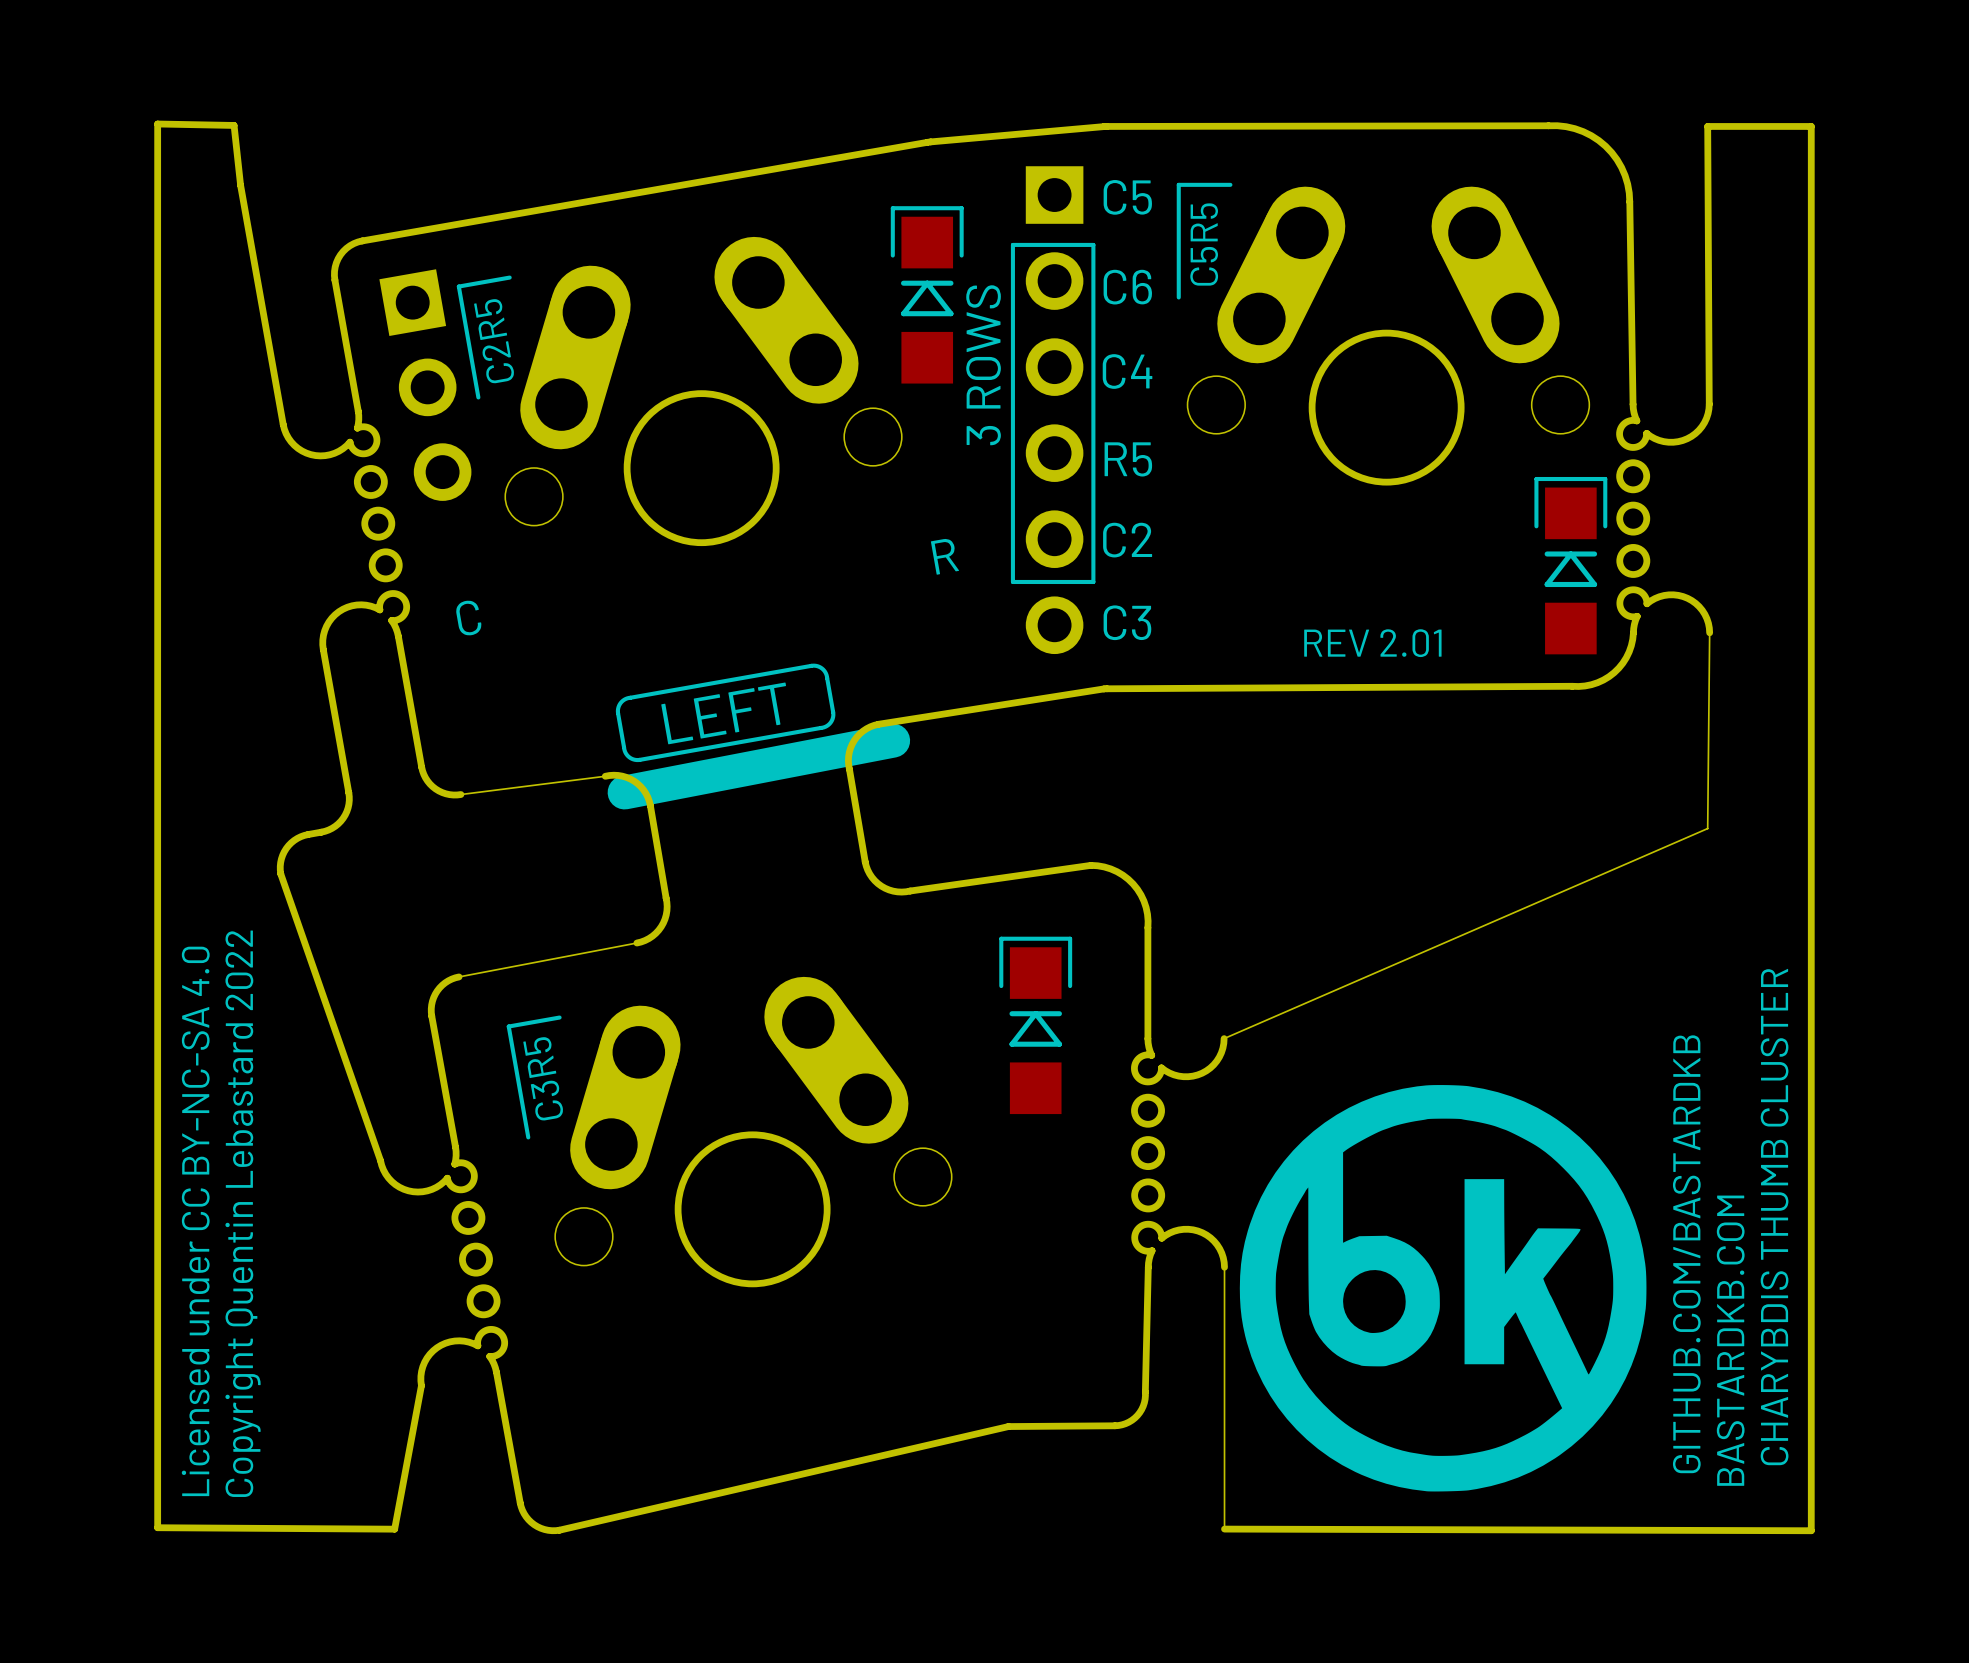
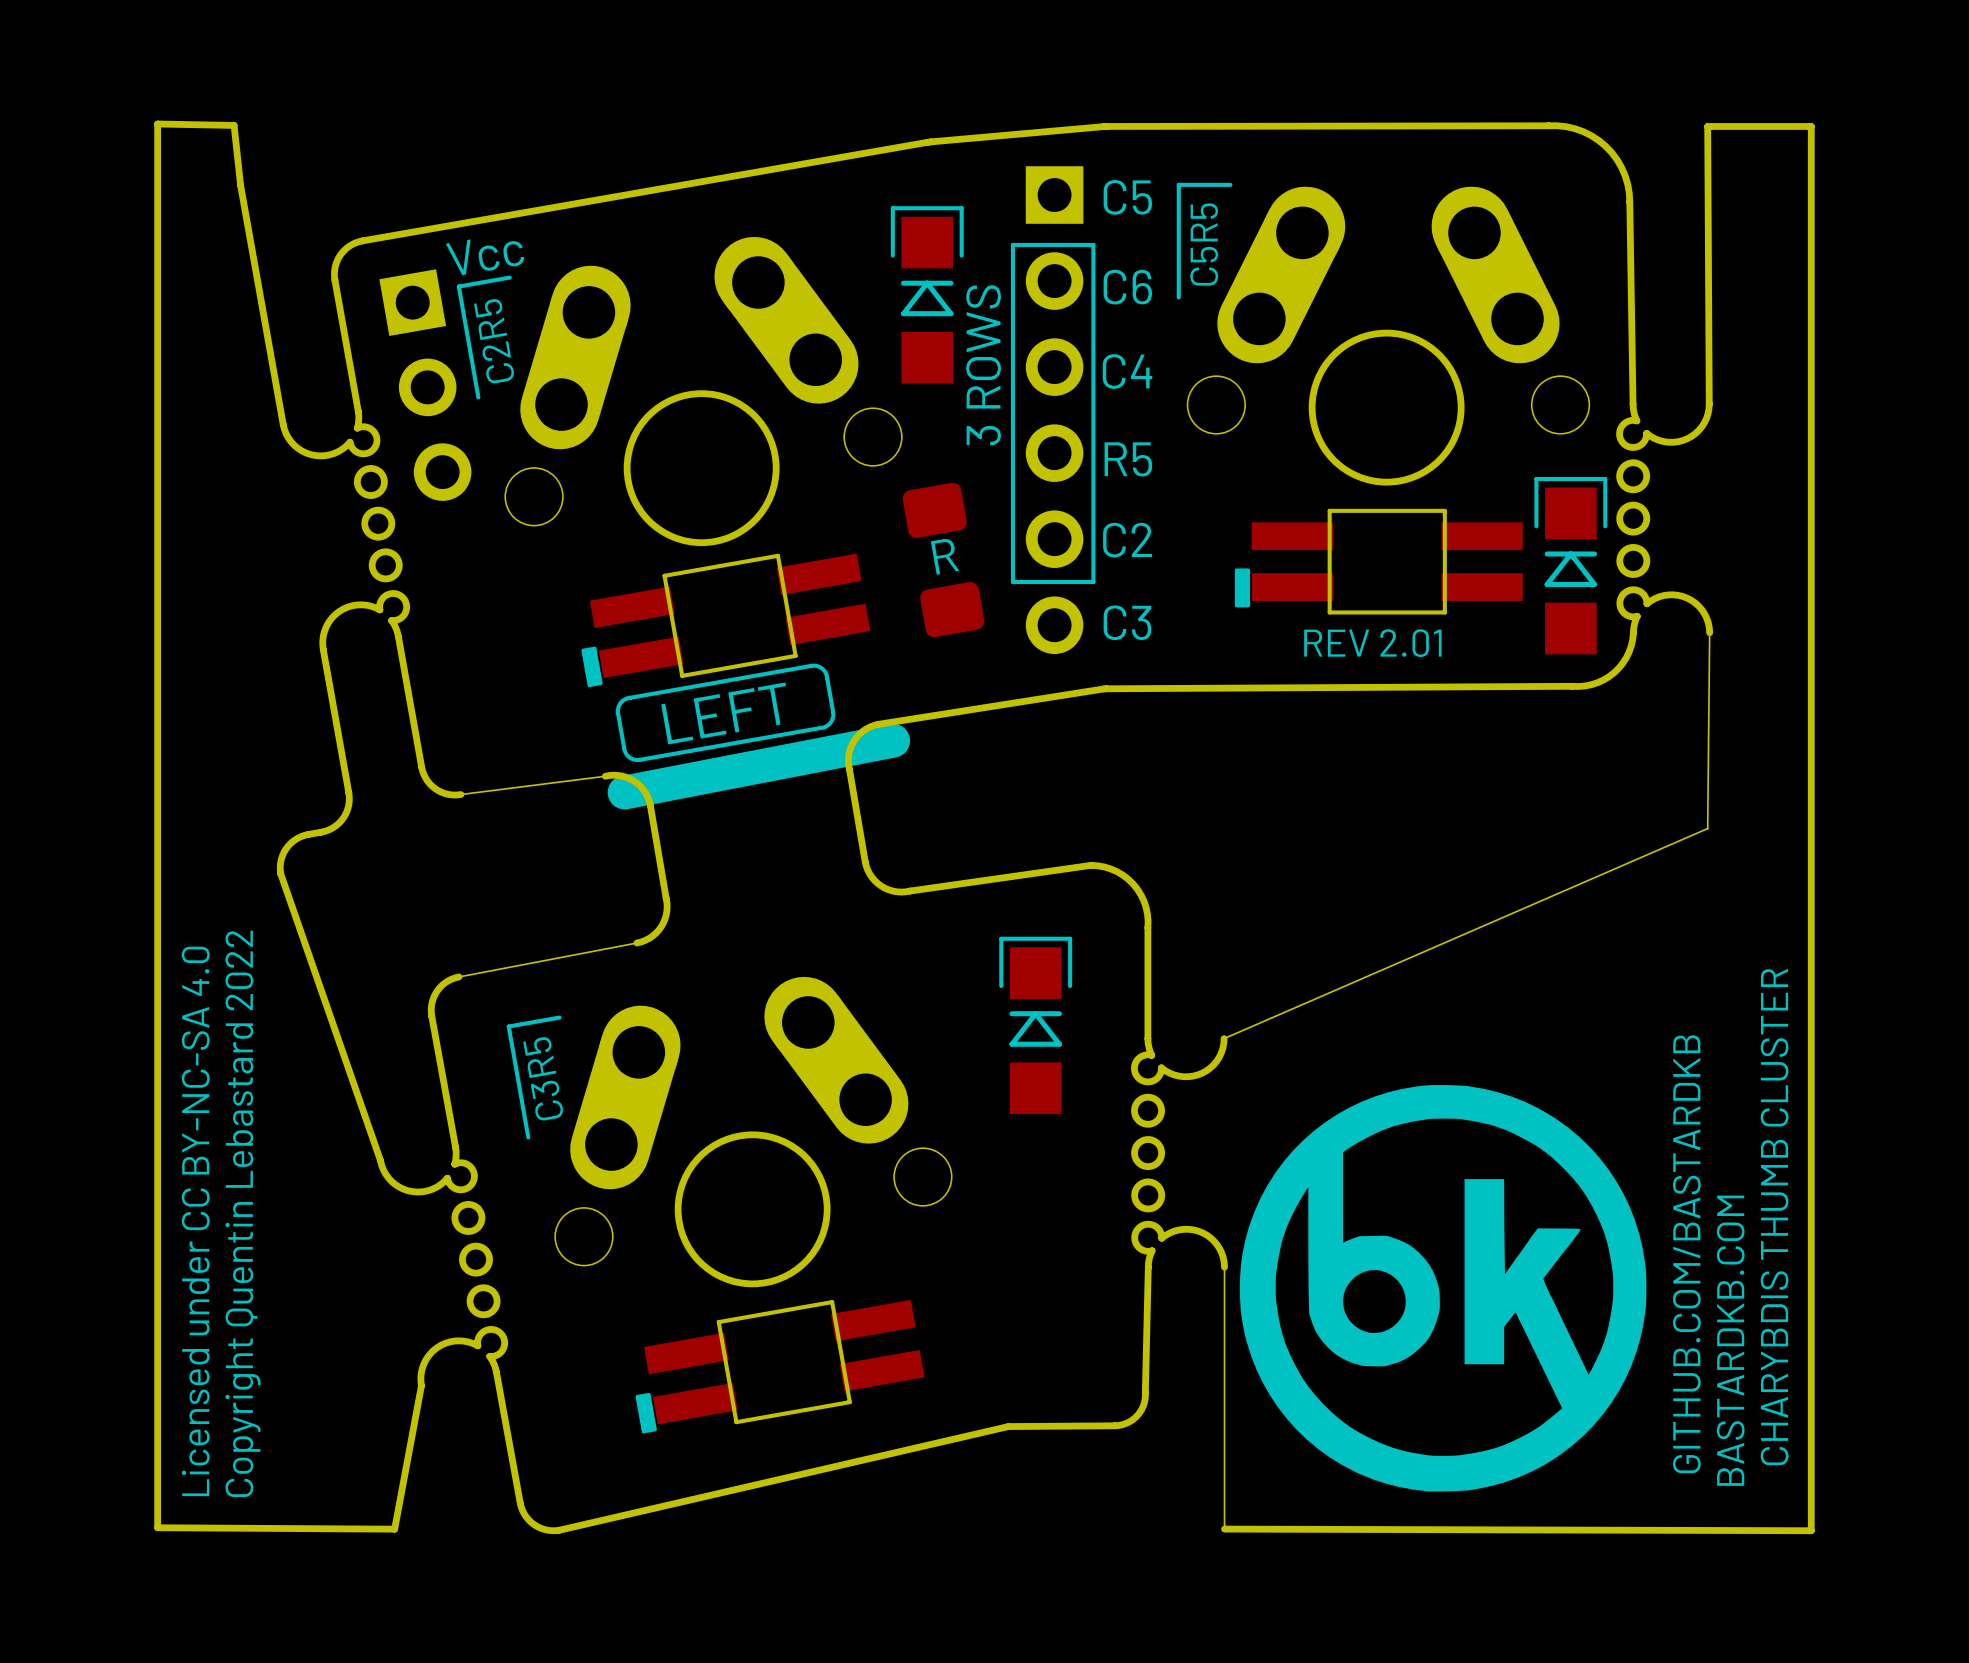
text: none -> Vcc (485, 257)
part: none -> (943, 559)
part: none -> (1378, 561)
text: C (468, 618) -> none
part: none -> (725, 620)
part: none -> (780, 1366)

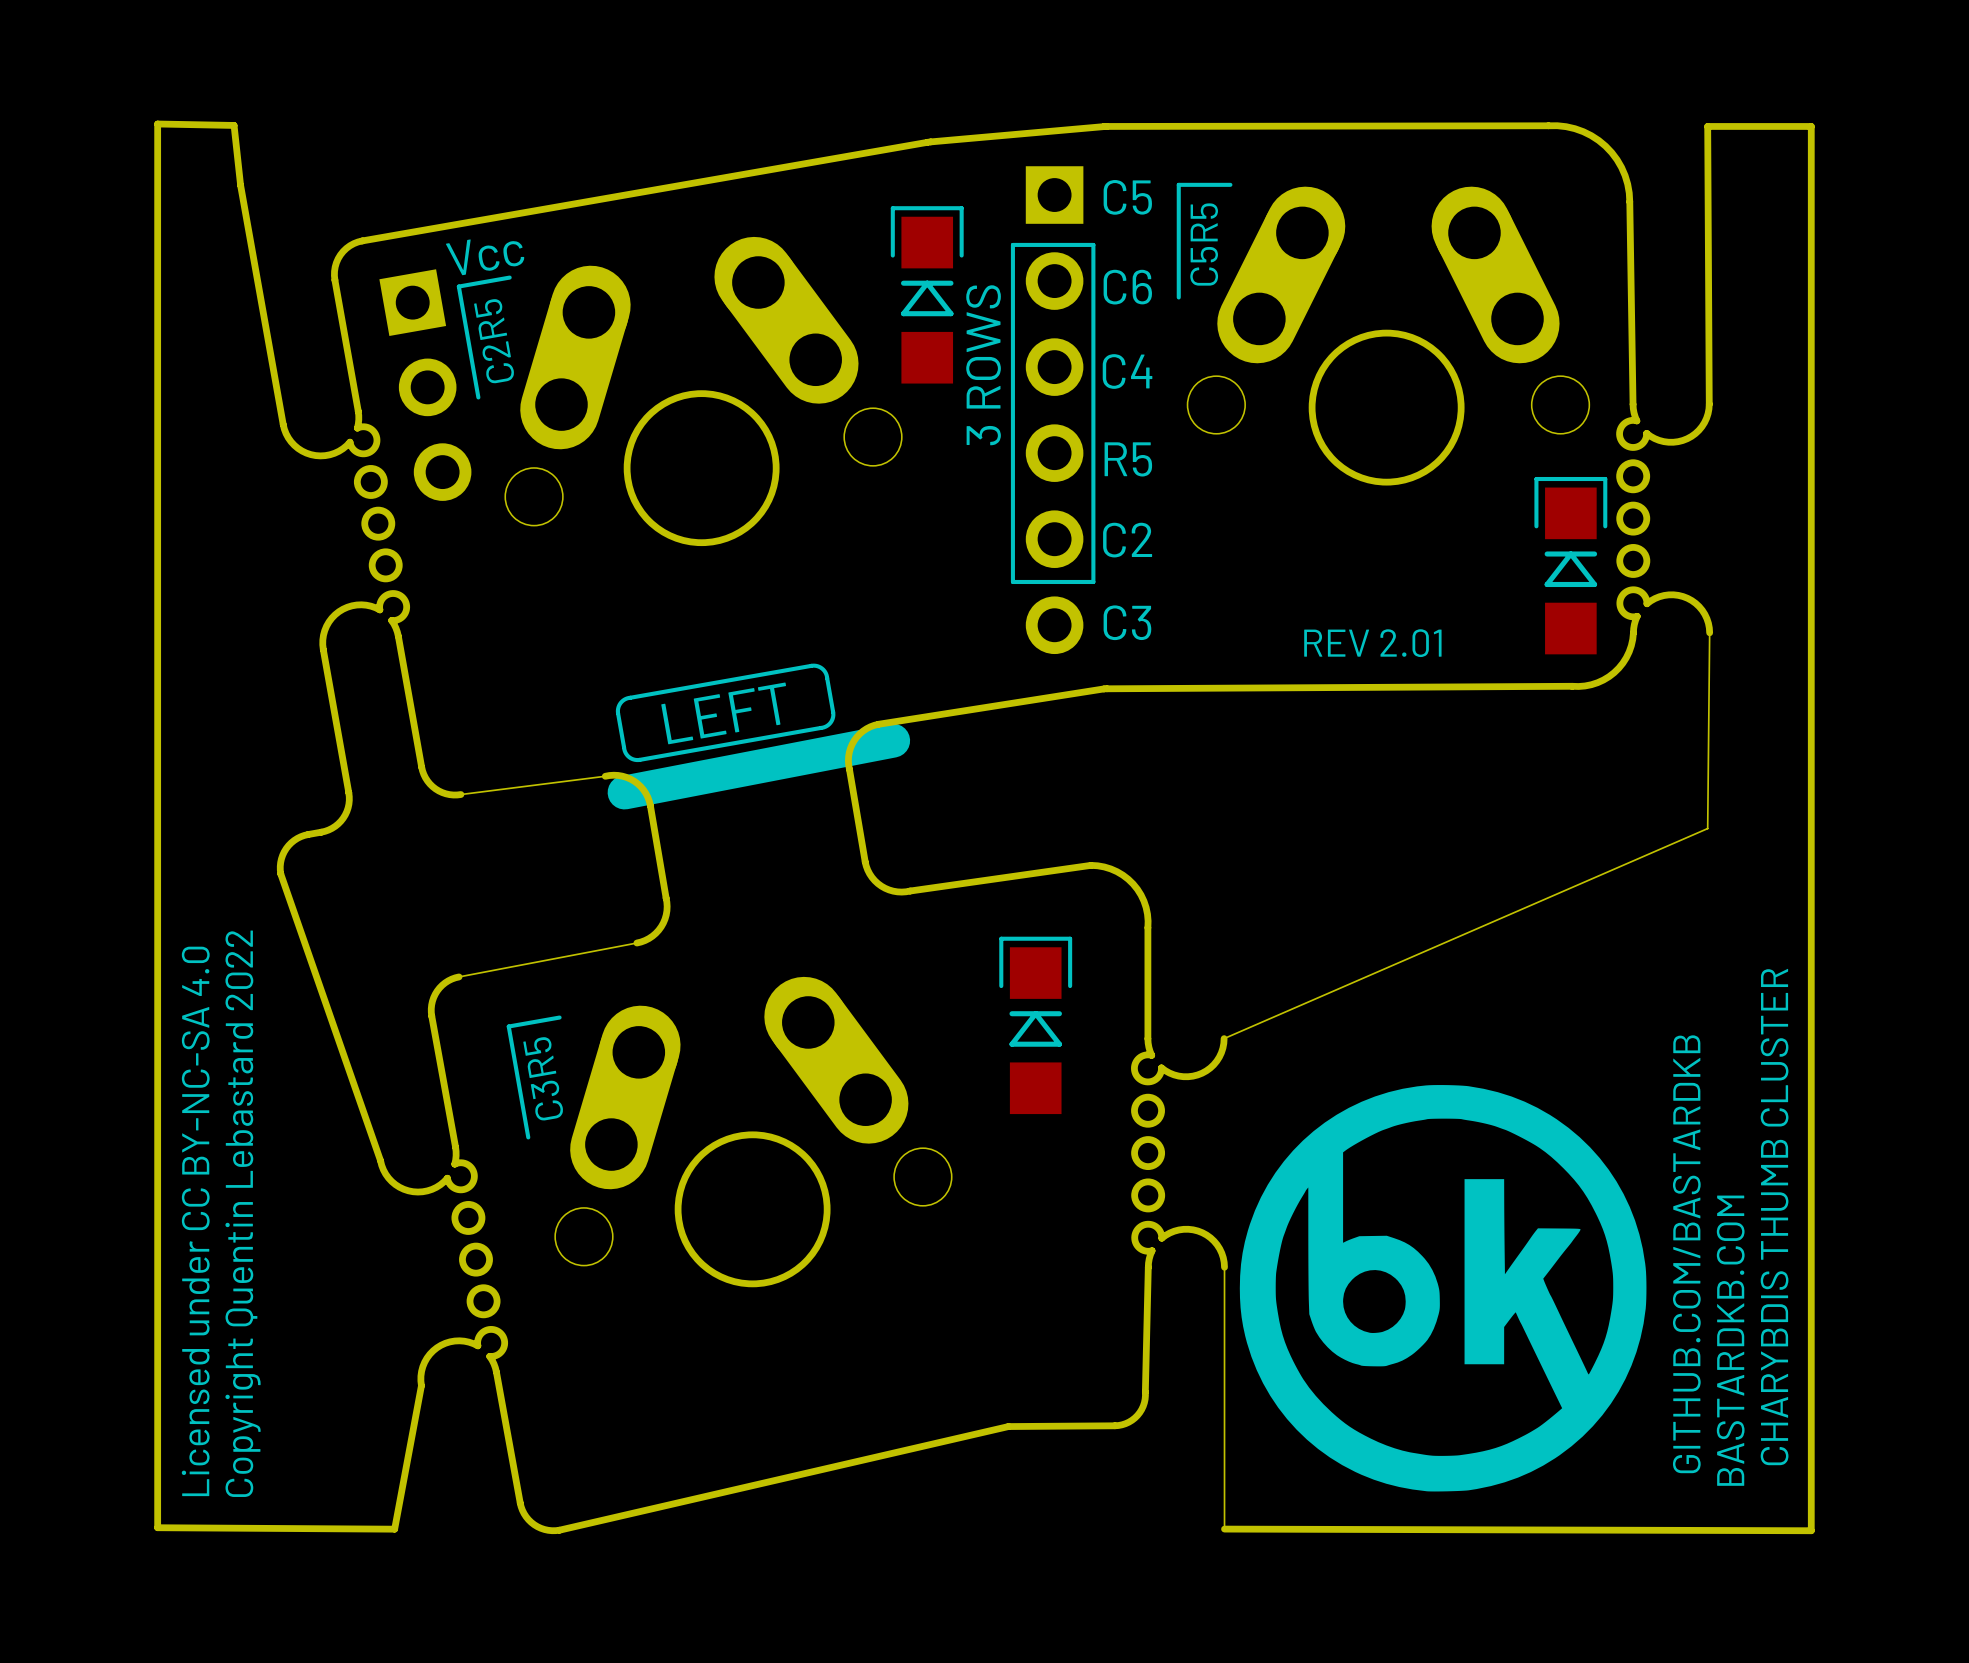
text: R (944, 556) -> none
part: (943, 559) -> none
part: (1378, 561) -> none
part: (725, 620) -> none
part: (780, 1366) -> none

